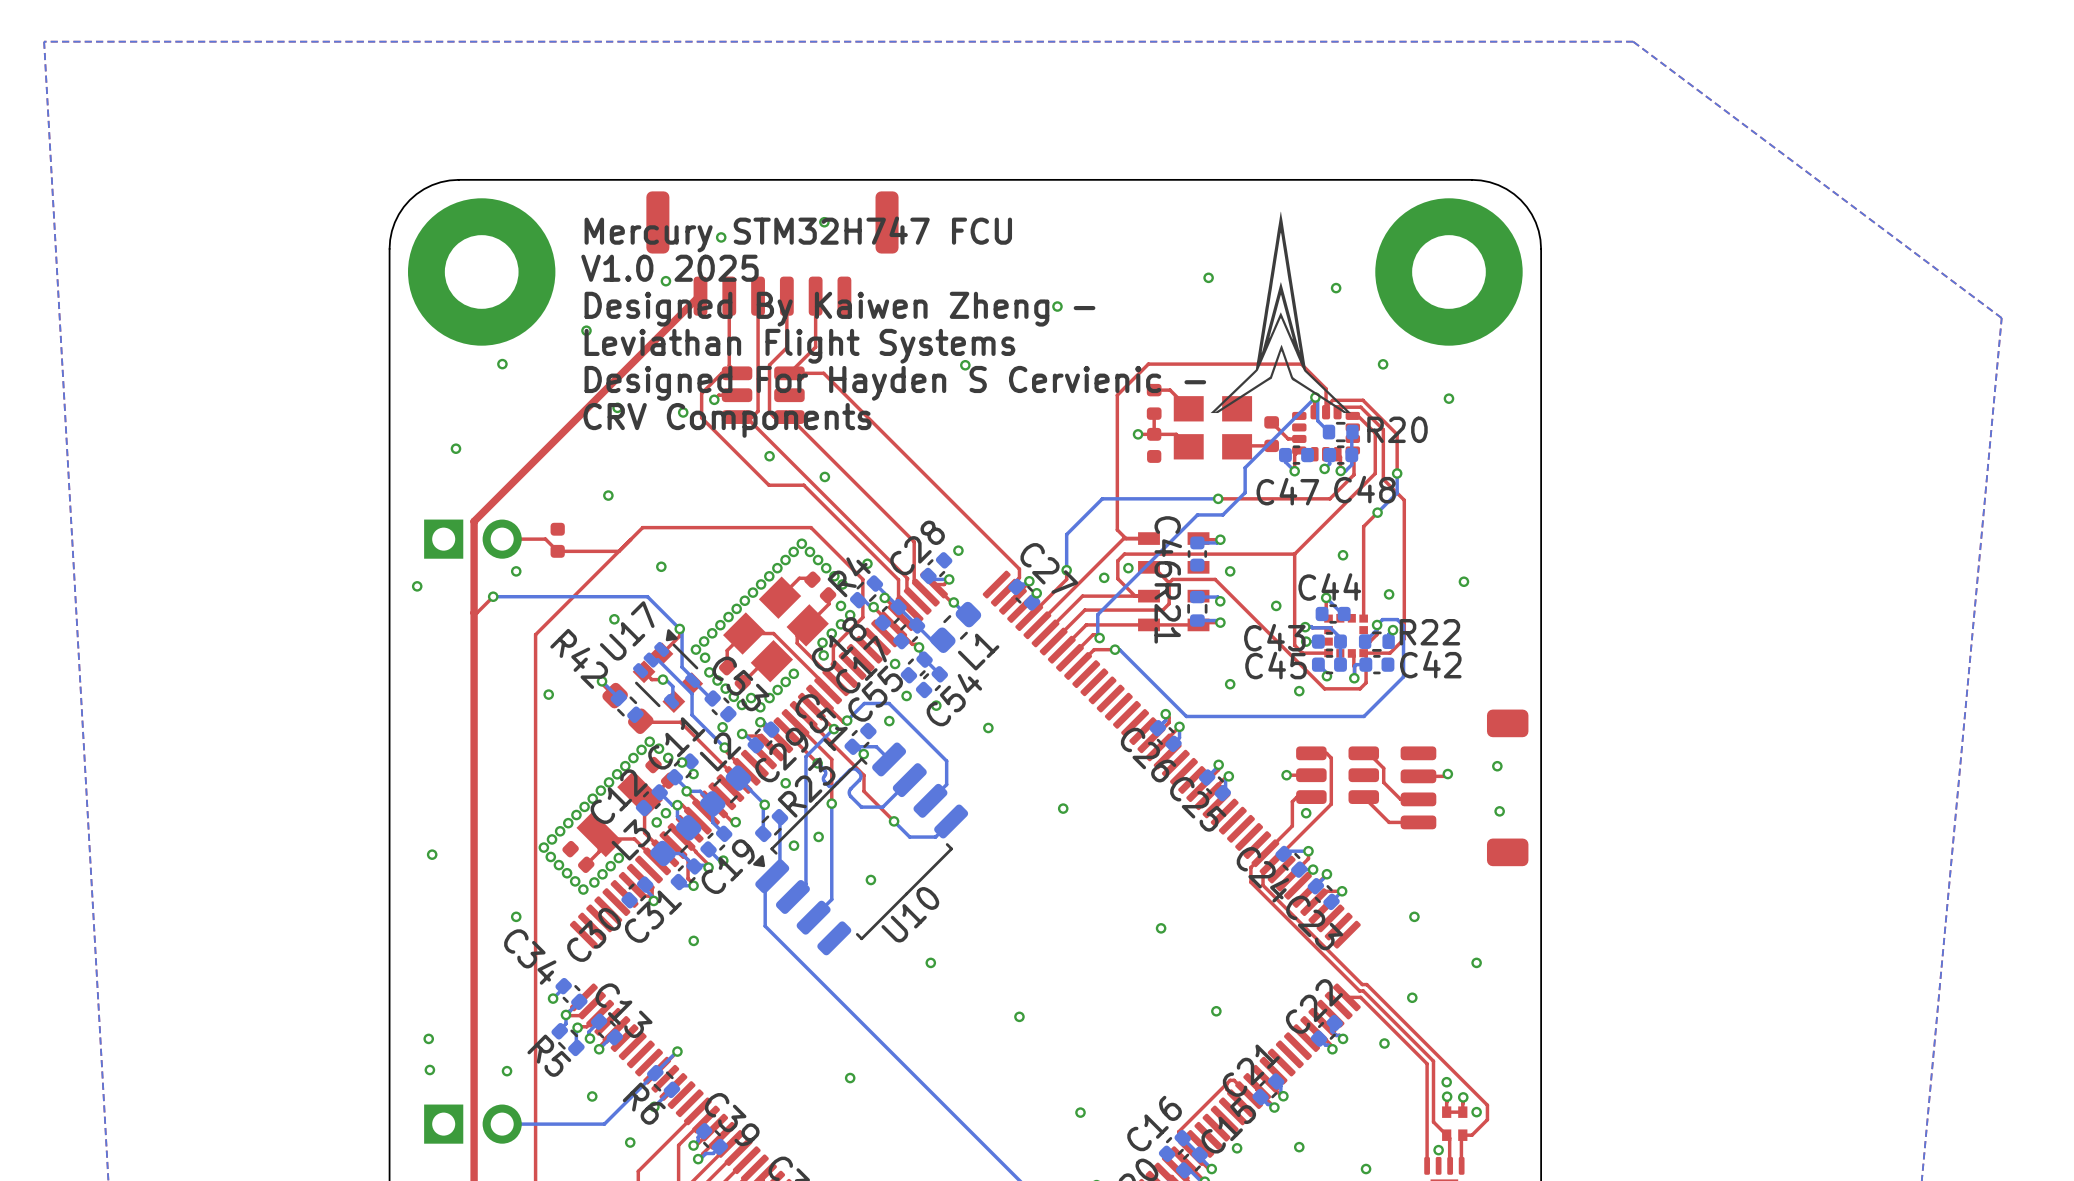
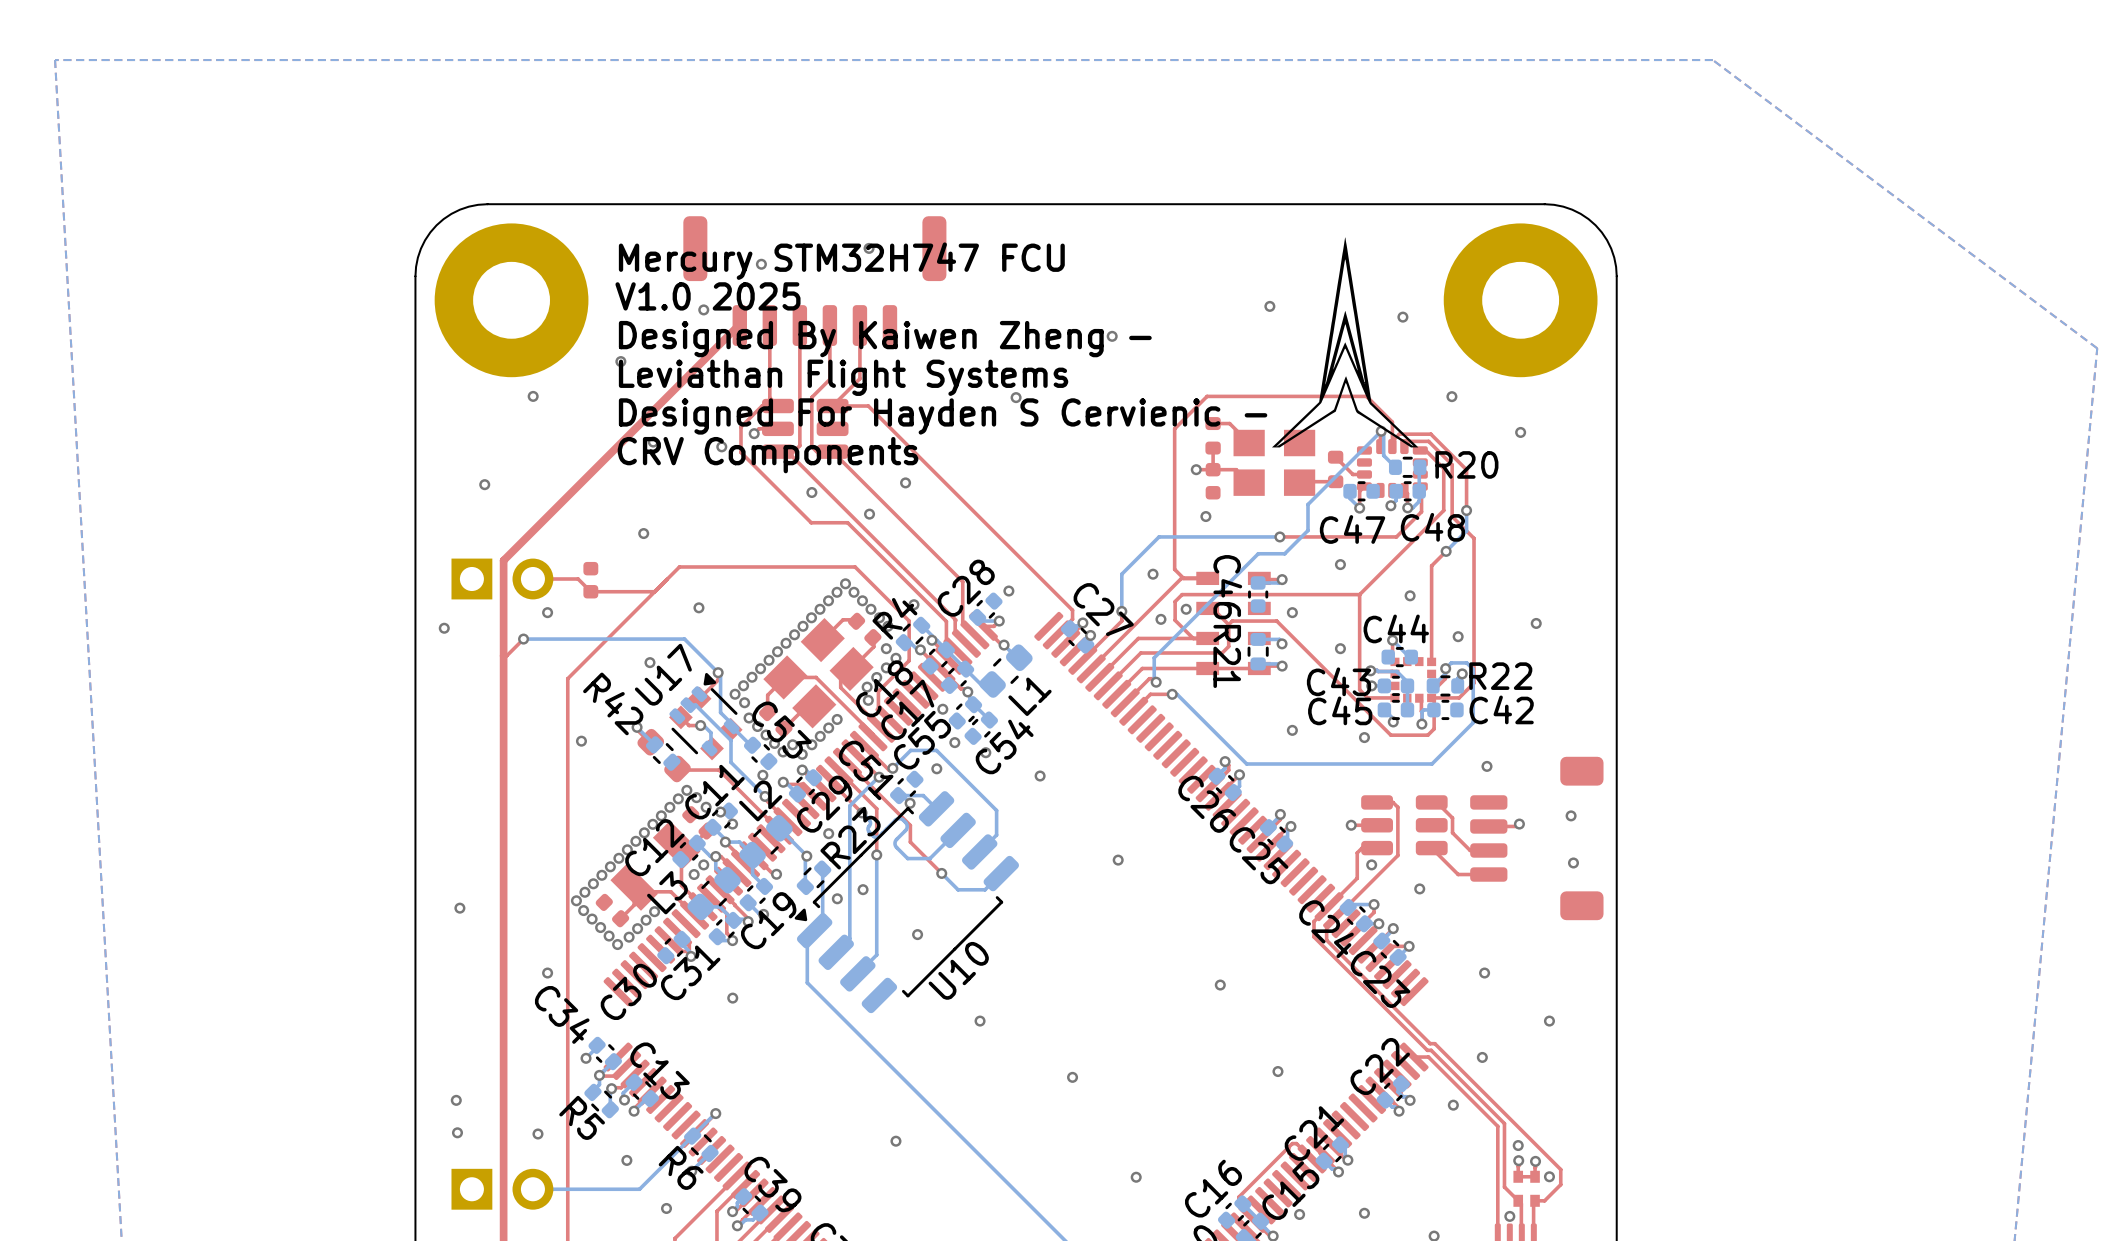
via: none -> (905, 482)
via: none -> (1205, 516)
via: none -> (1340, 564)
via: none -> (1153, 574)
via: none -> (1486, 766)
via: none -> (1419, 888)

